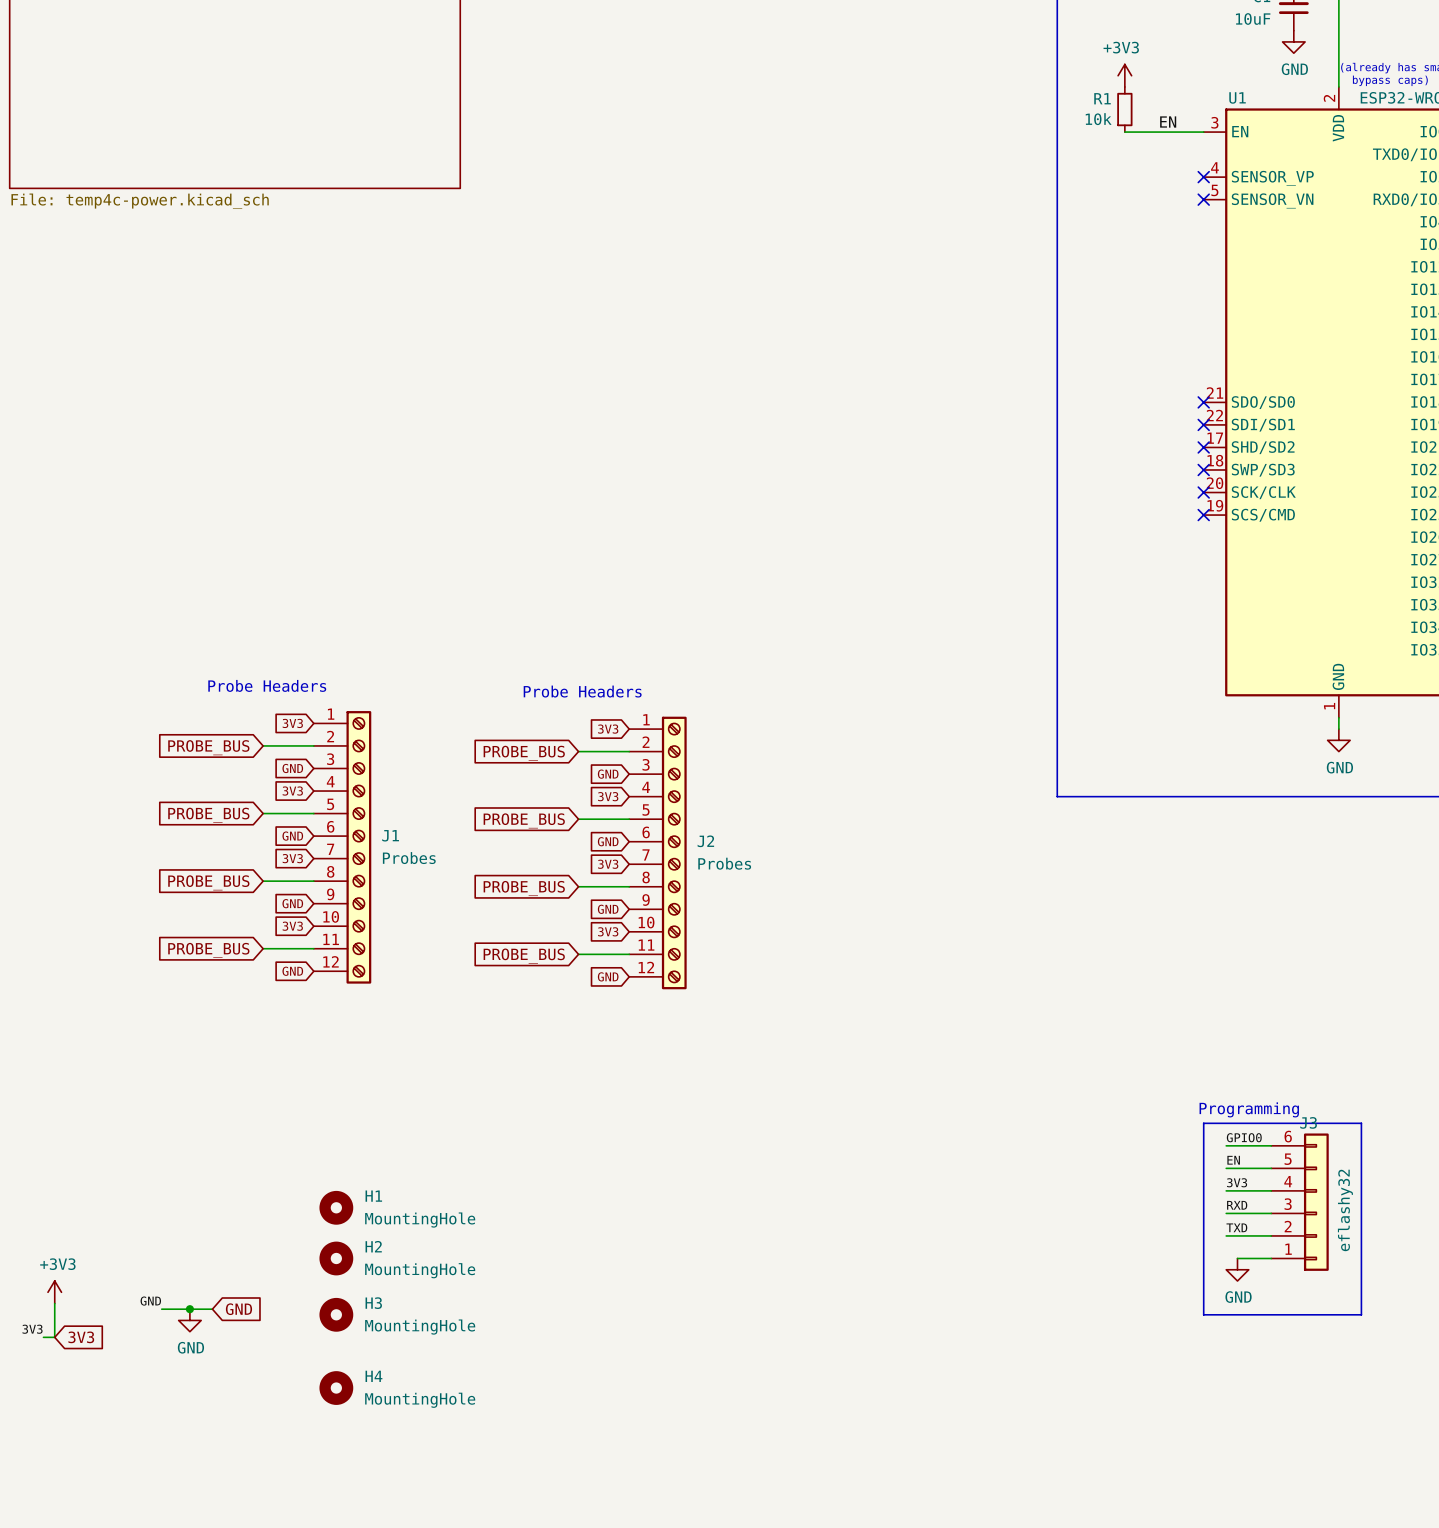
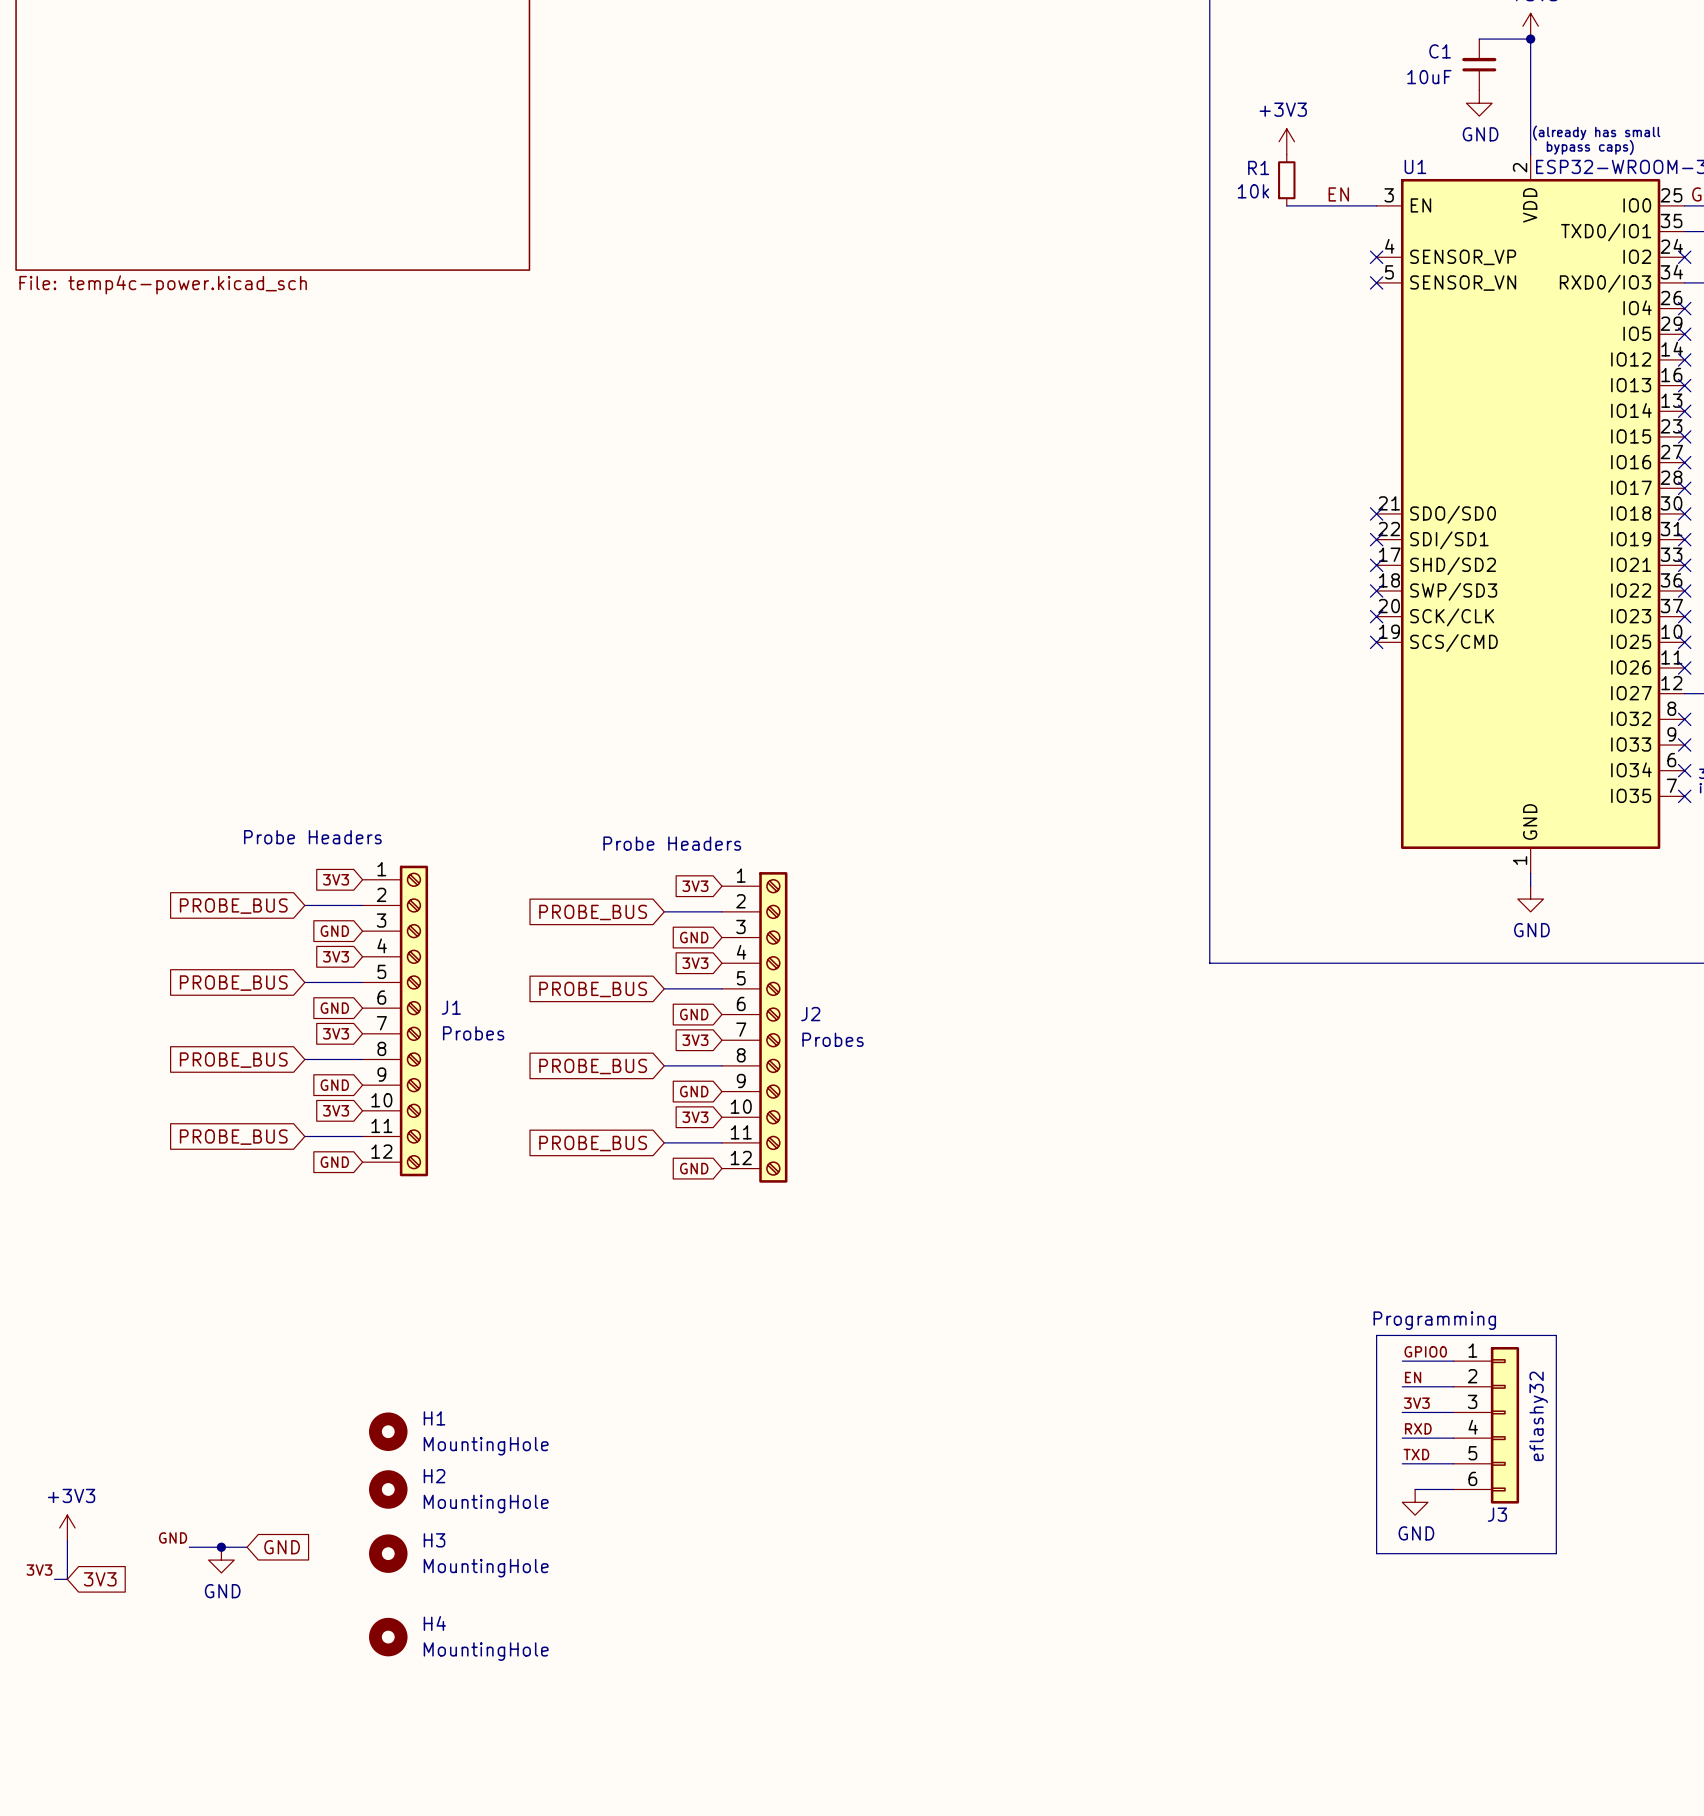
J3 flip: as is (1316, 1202) -> up-down (1504, 1425)

